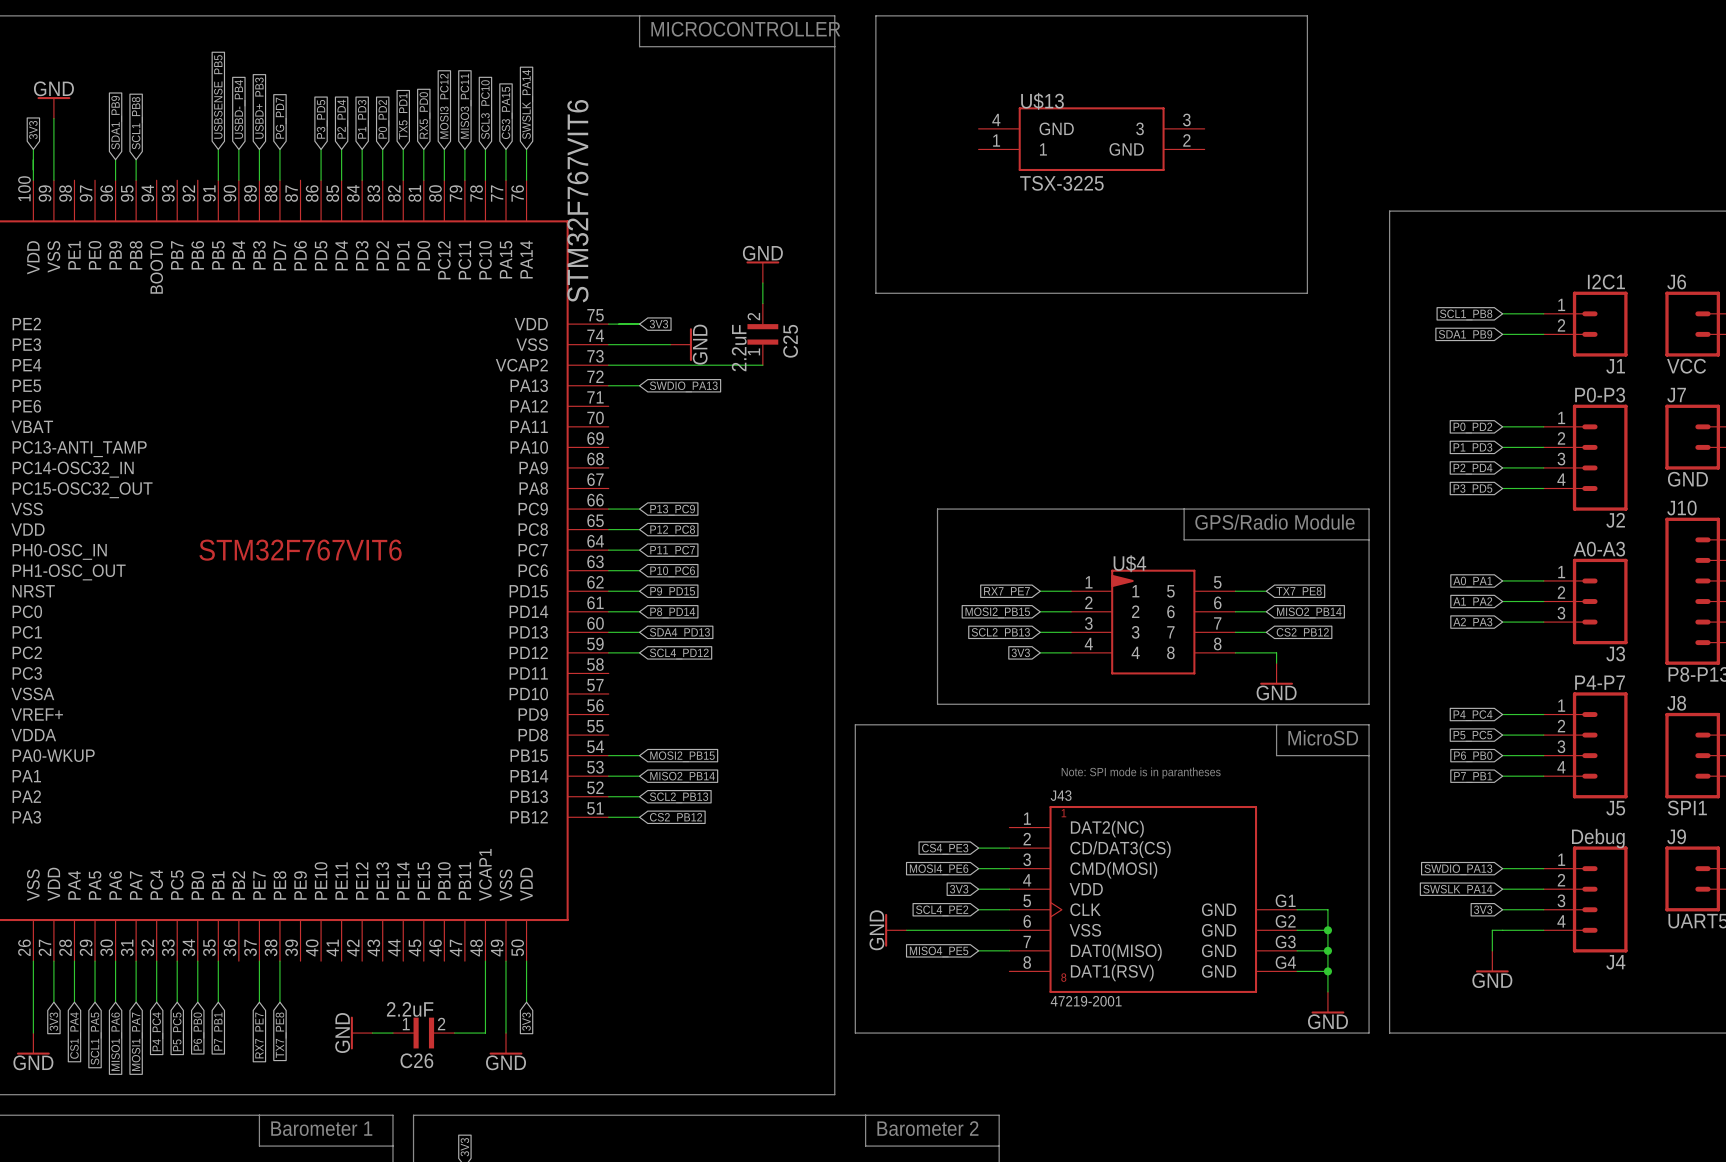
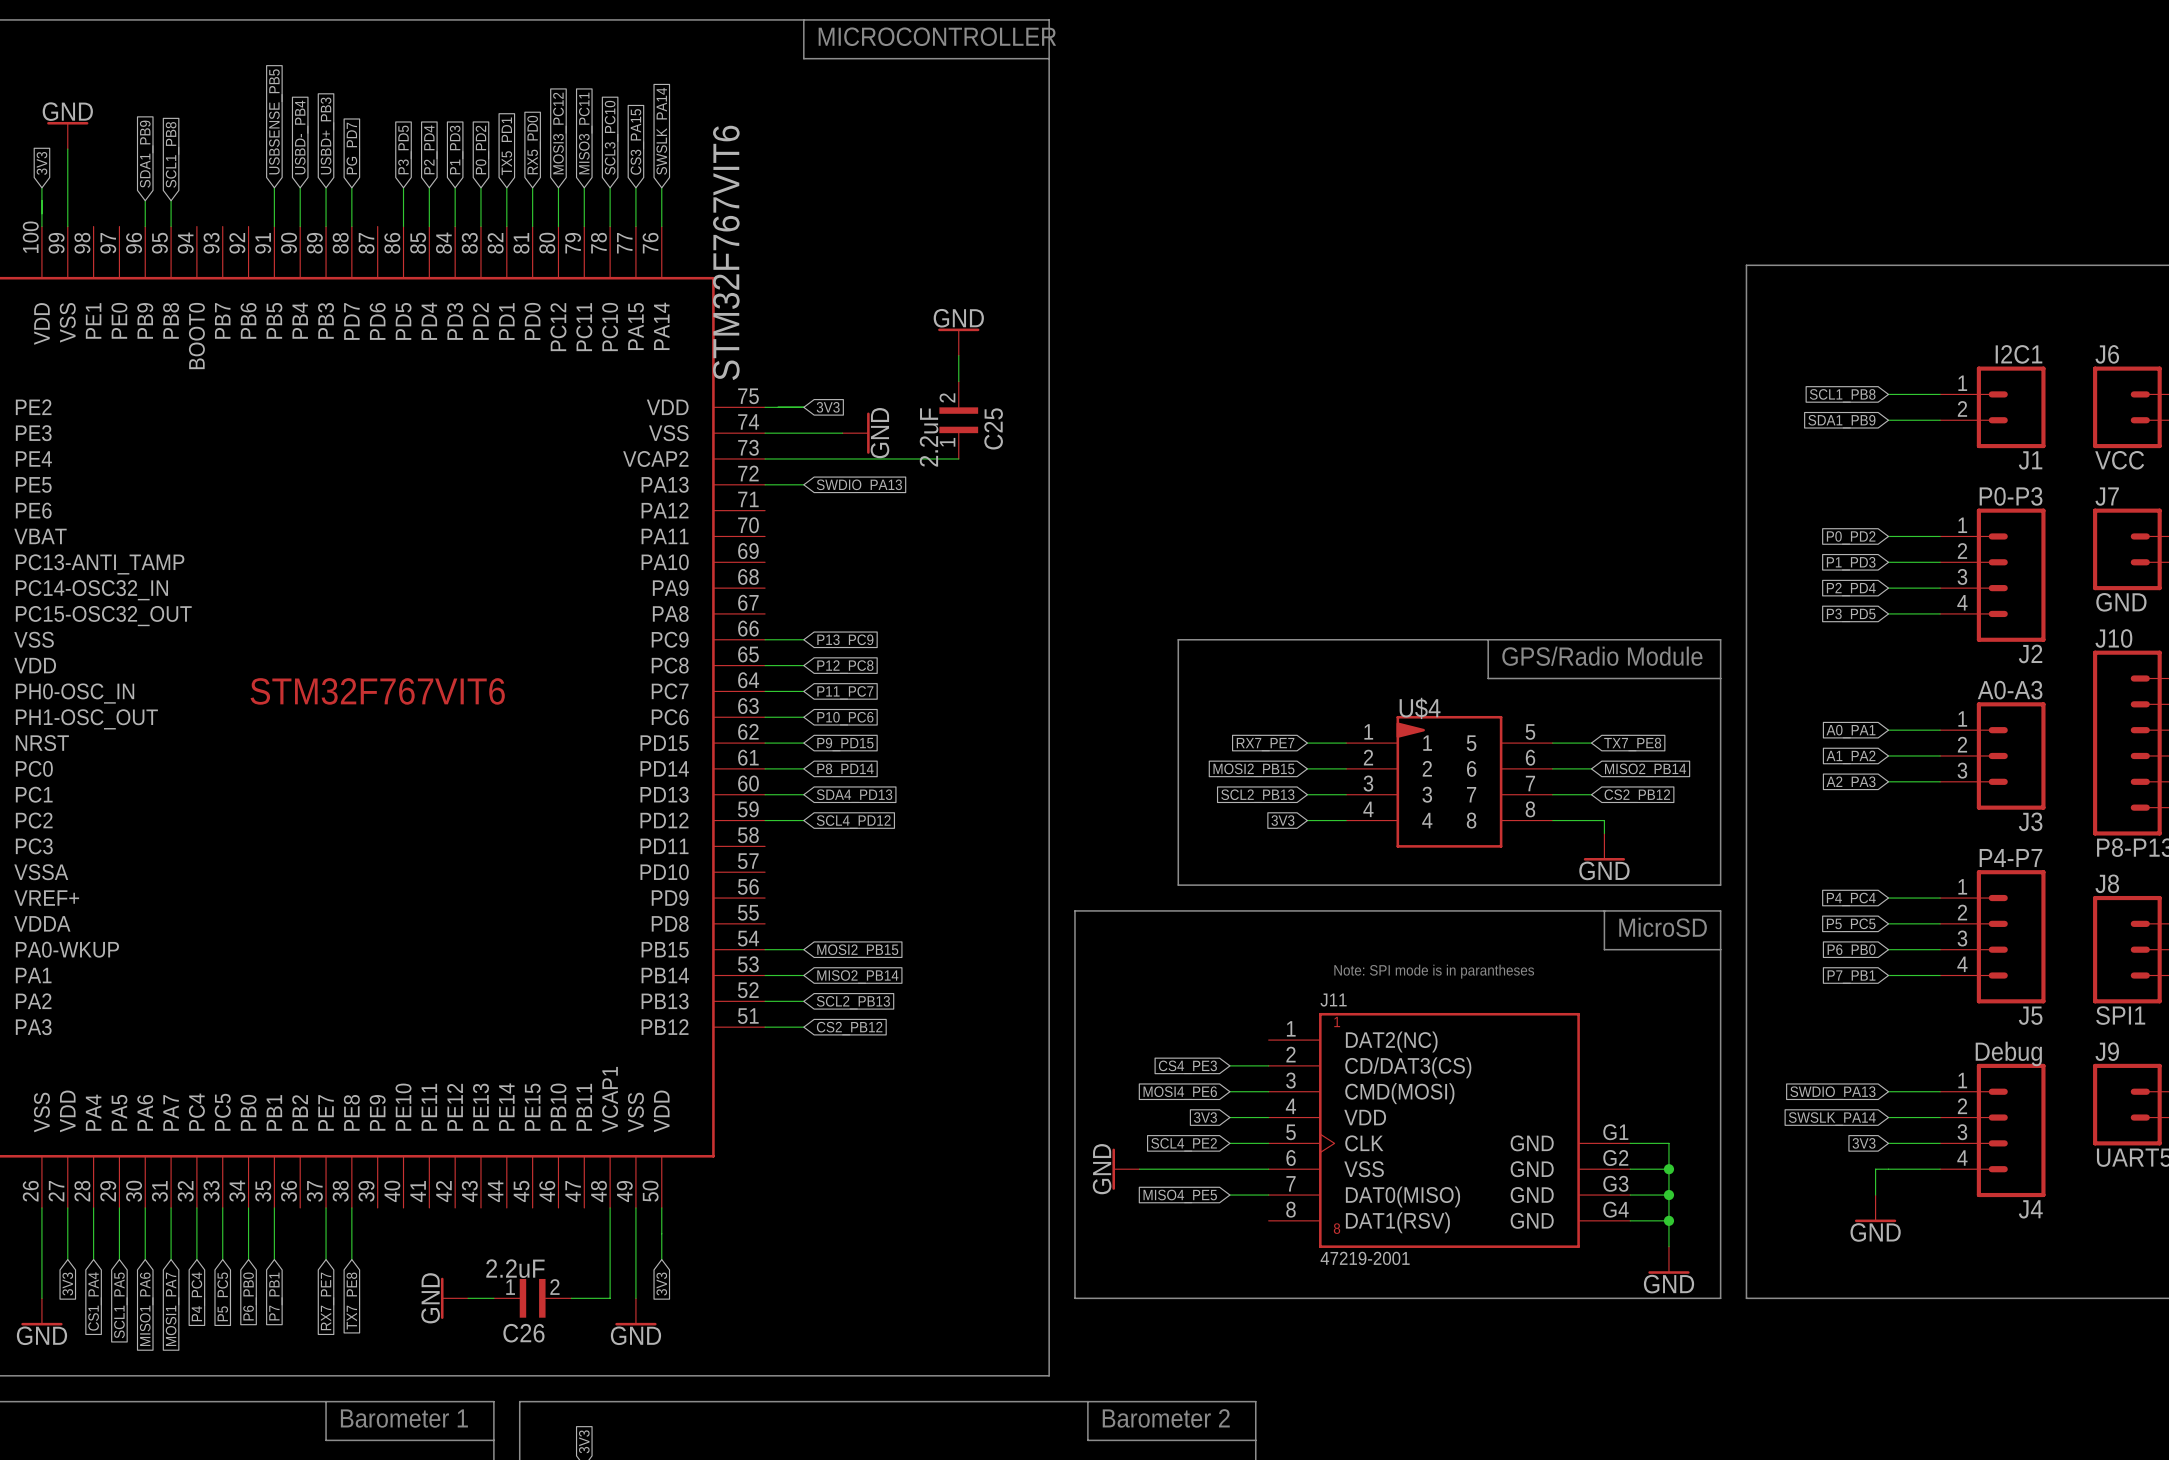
line: (875, 15) (875, 293) (1307, 293) (1307, 15) (875, 15) -> none
U$13: TSX-3225 (1091, 139) -> none
J43 name: J43 (1061, 795) -> J11 (1333, 1000)

